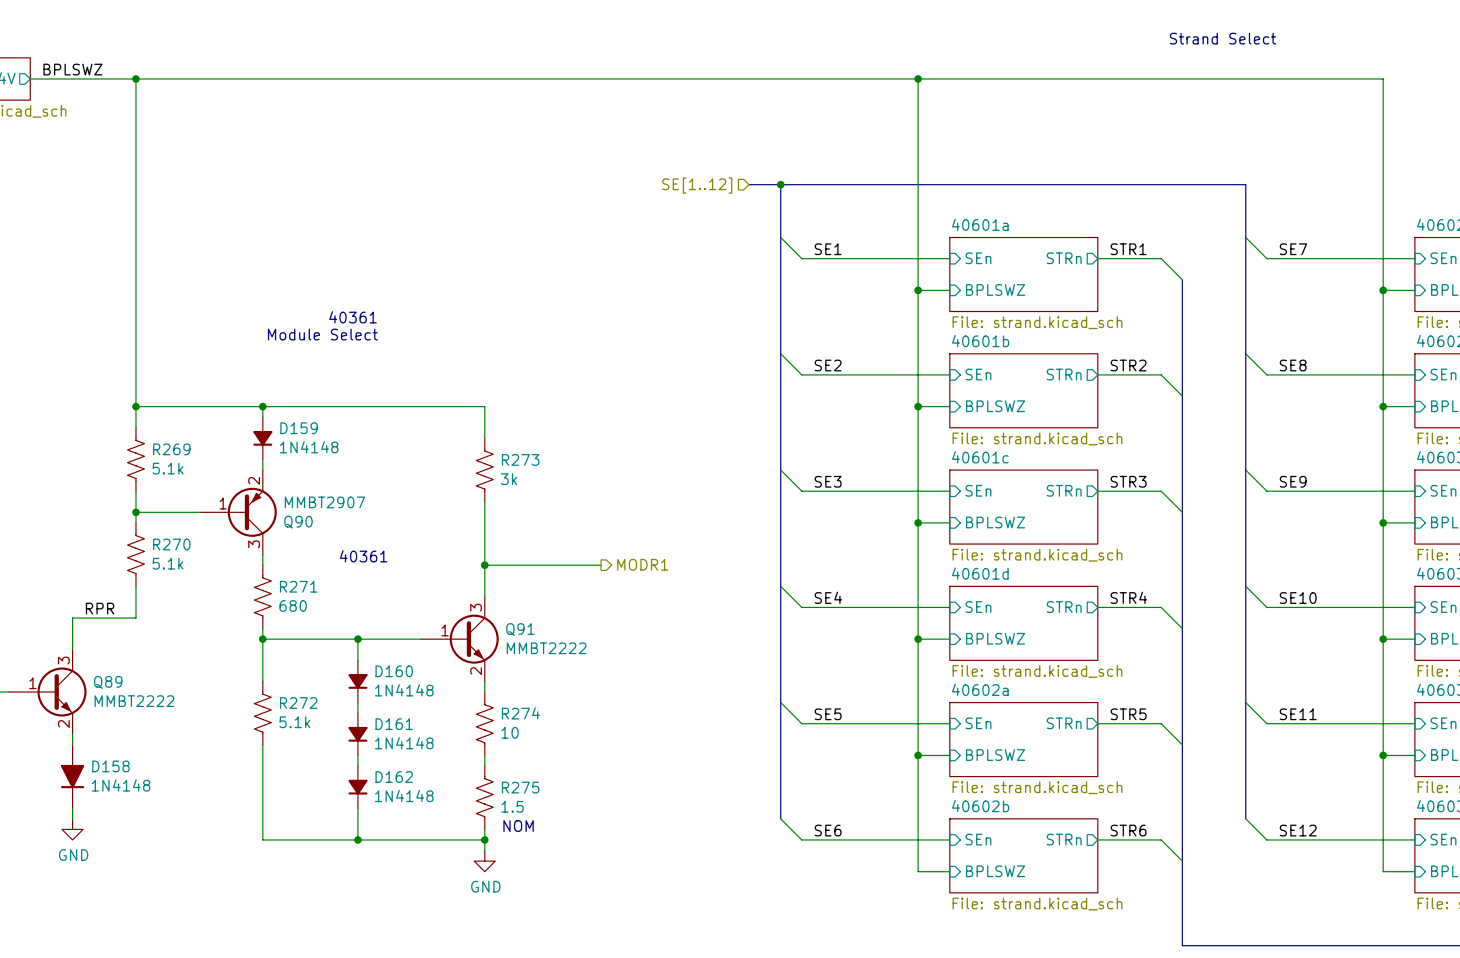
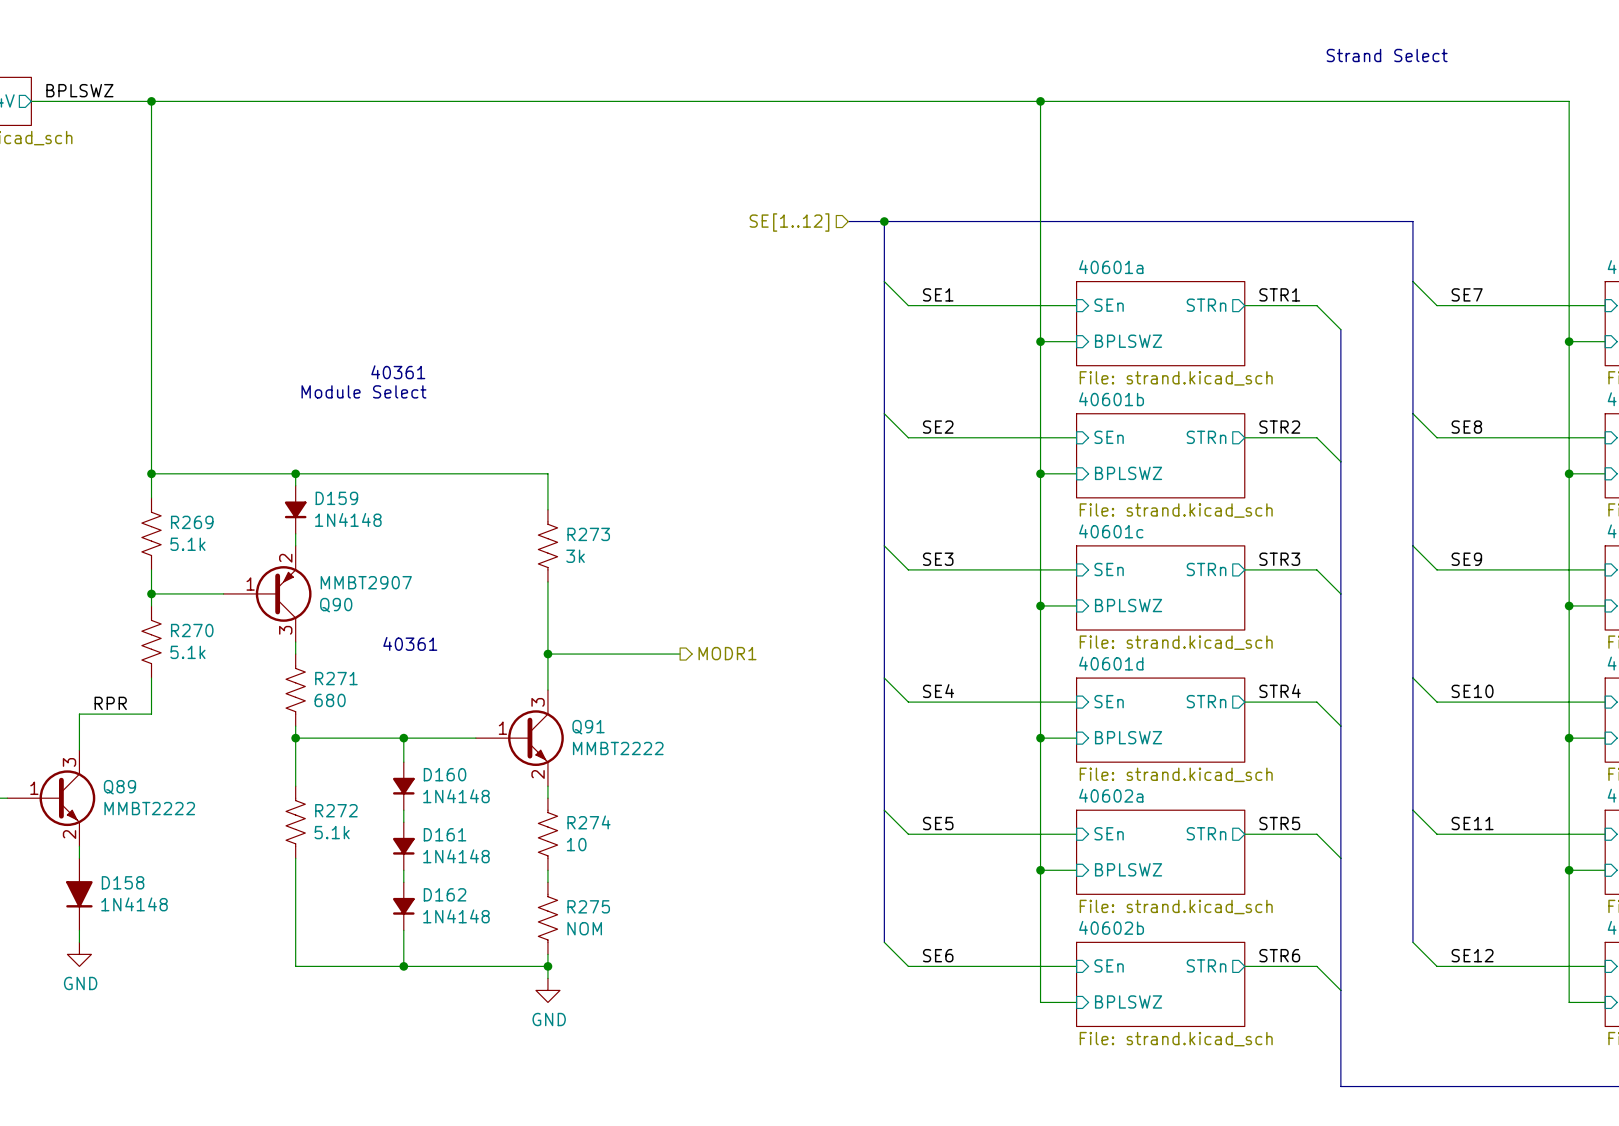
R275 value: 1.5 (512, 806) -> NOM (584, 928)
text: NOM (518, 826) -> none

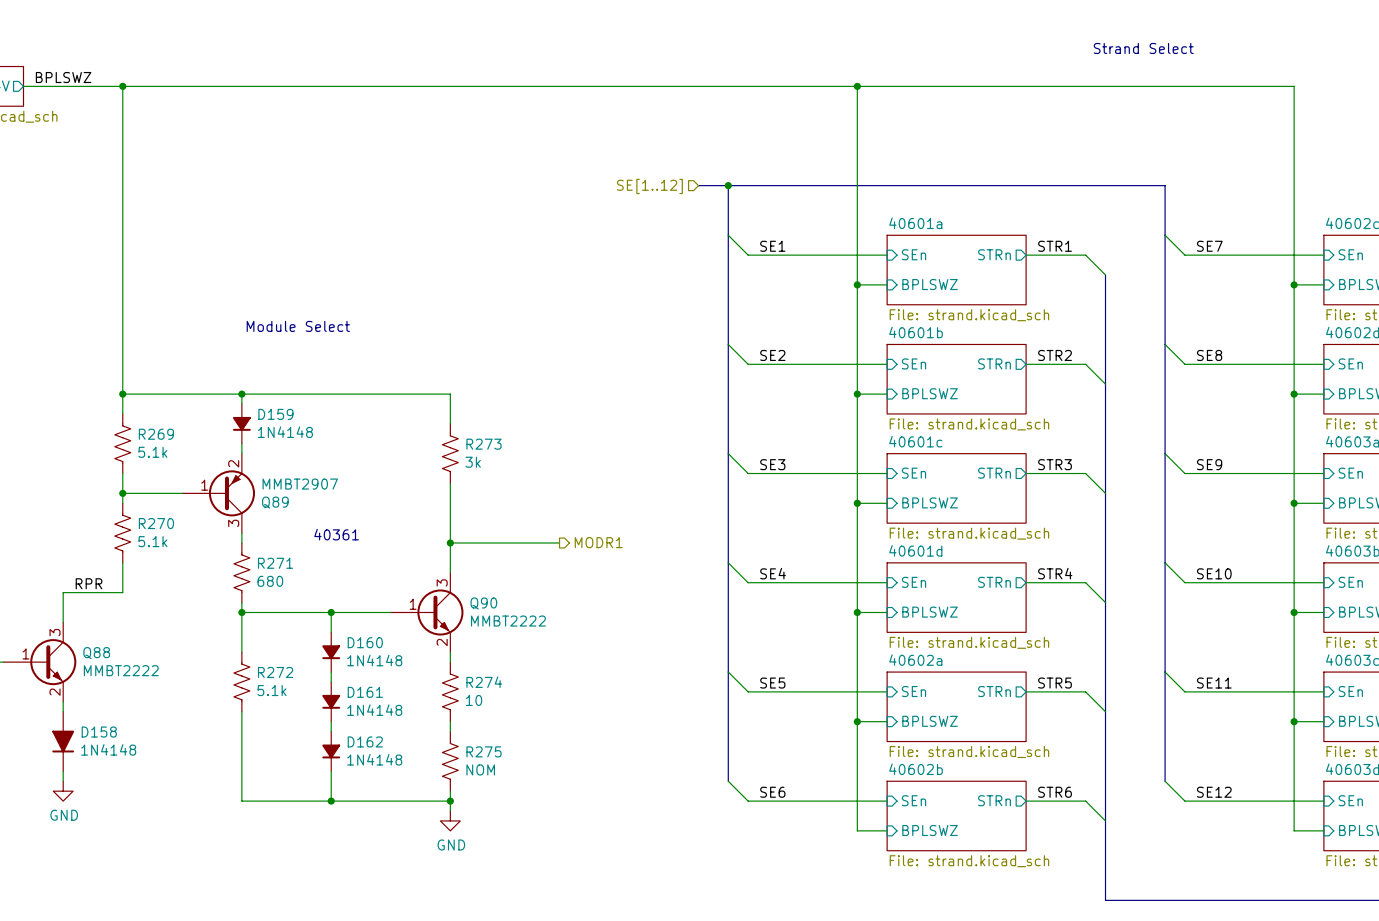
text: 40361 (398, 372) -> none
Q90 name: Q90 (336, 605) -> Q89 (275, 502)
Q91 name: Q91 (588, 727) -> Q90 (483, 603)
Q89 name: Q89 (119, 787) -> Q88 (96, 653)

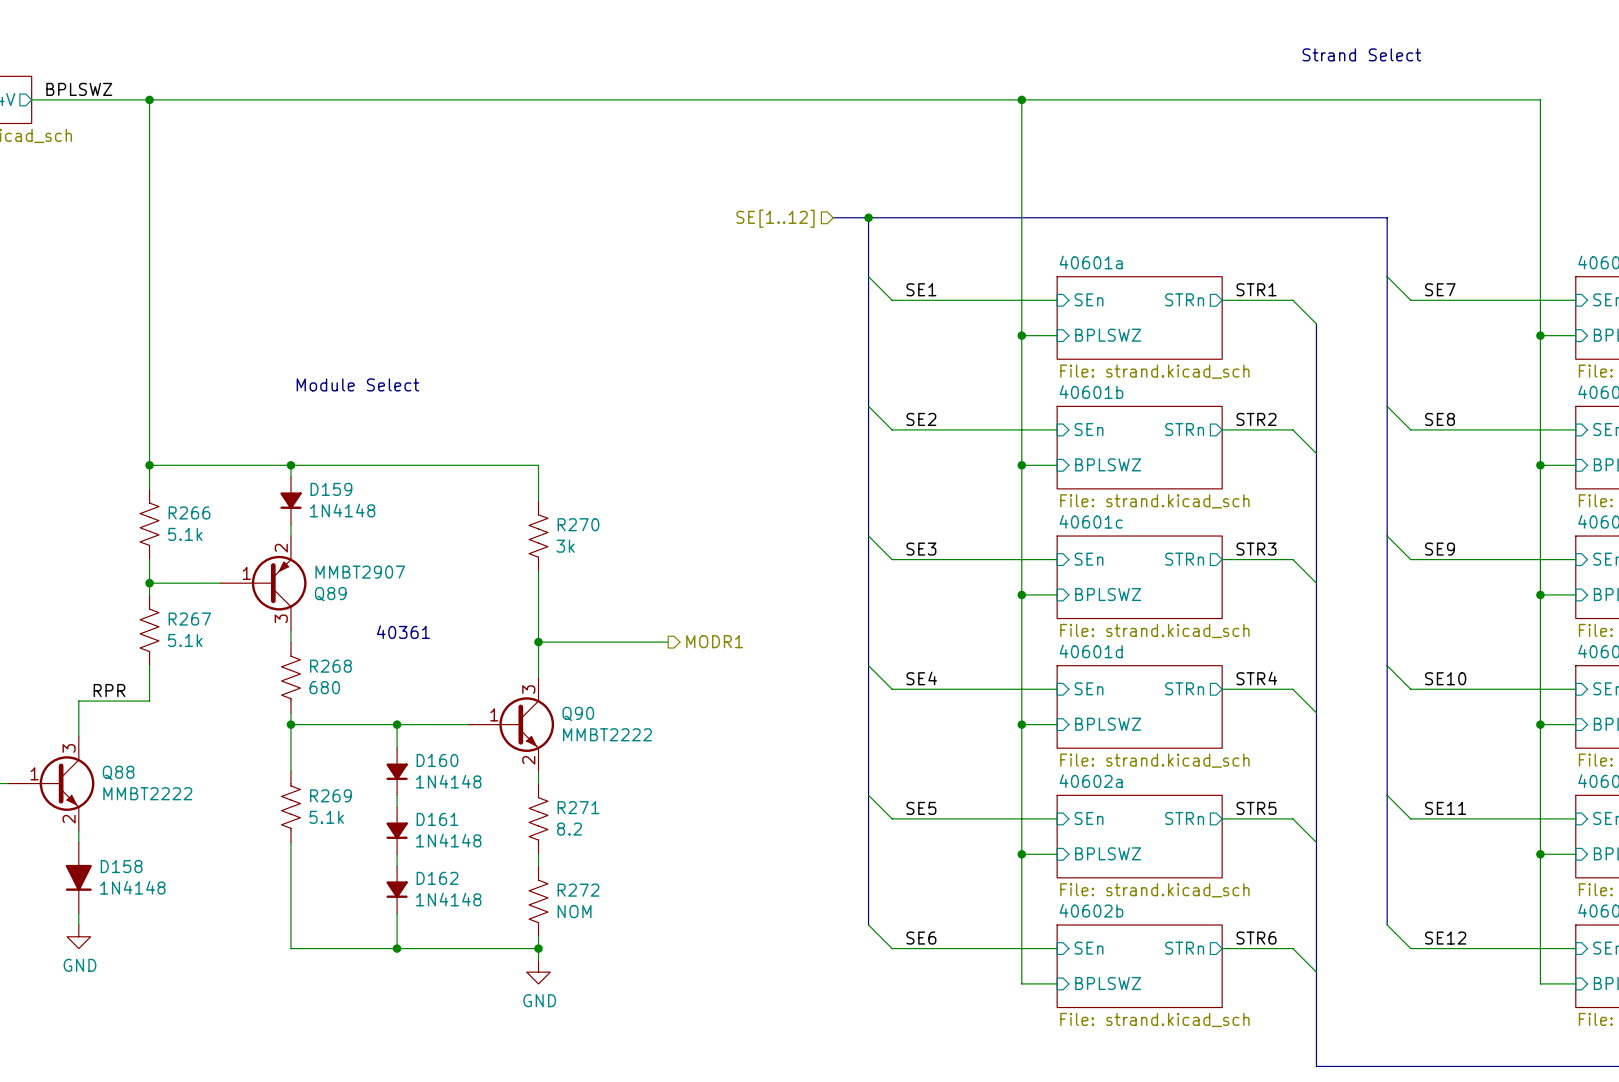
R269 name: R269 (156, 434) -> R266 (189, 512)
R273 name: R273 (484, 444) -> R270 (578, 524)
R270 name: R270 (156, 523) -> R267 (189, 619)
R271 name: R271 (275, 563) -> R268 (330, 666)
R272 name: R272 (275, 672) -> R269 (330, 795)
R274 name: R274 (484, 682) -> R271 (578, 807)
R274 value: 10 (474, 700) -> 8.2 (569, 829)
R275 name: R275 (484, 751) -> R272 (578, 890)

